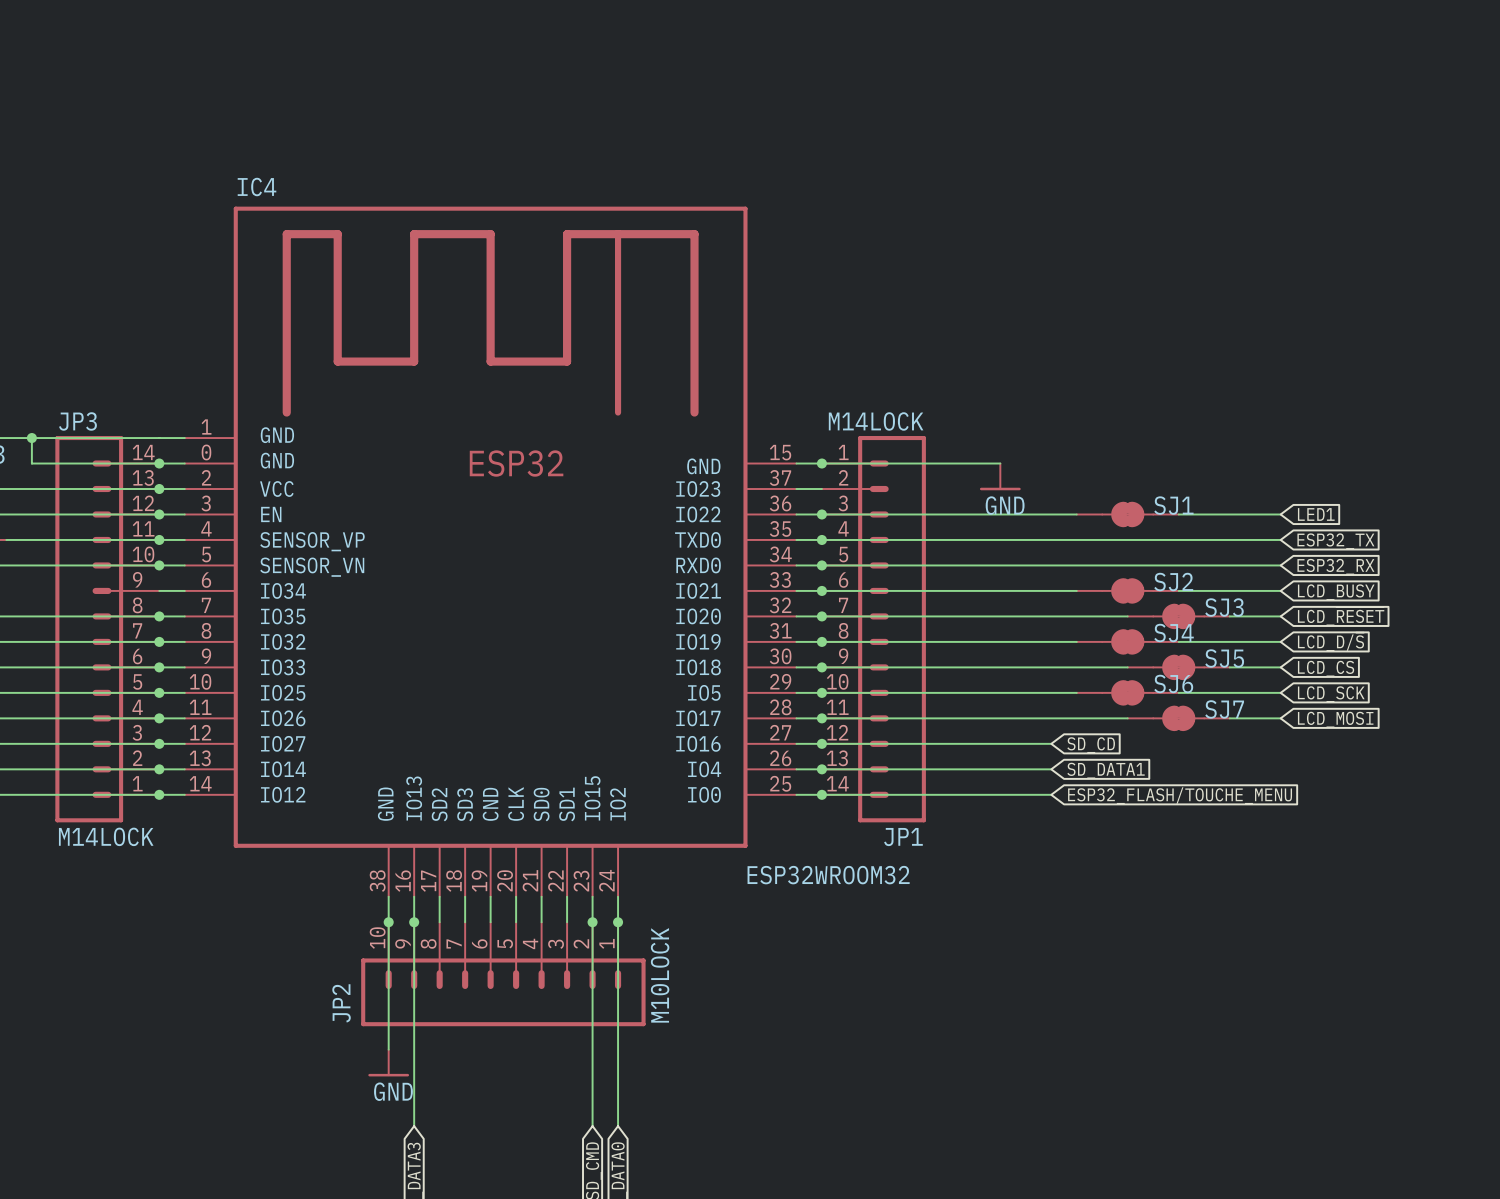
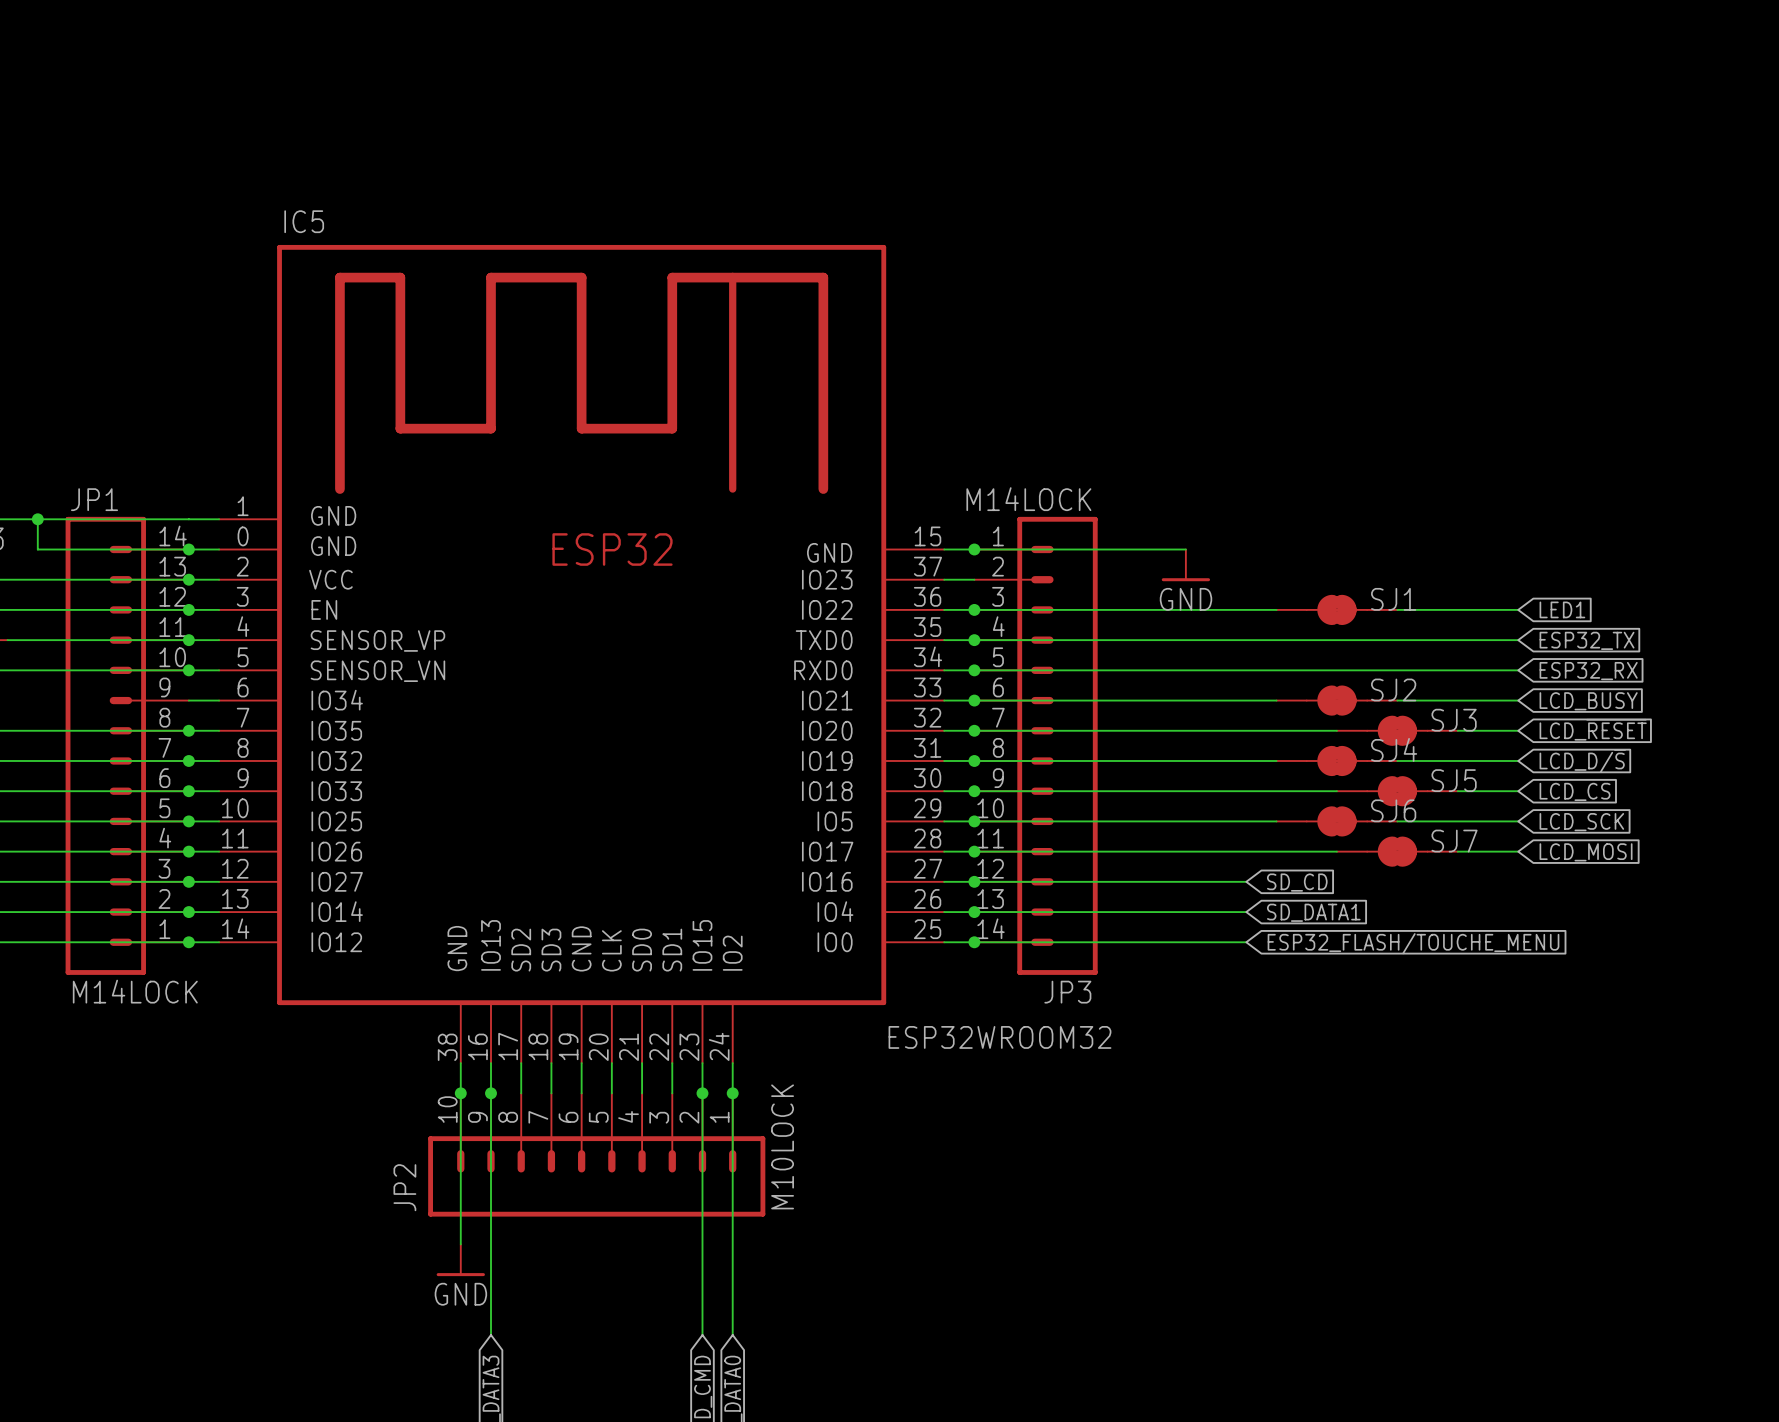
IC4 name: IC4 (257, 187) -> IC5 (304, 221)
JP3 name: JP3 (77, 421) -> JP1 (94, 499)
JP1 name: JP1 (903, 837) -> JP3 (1067, 992)

